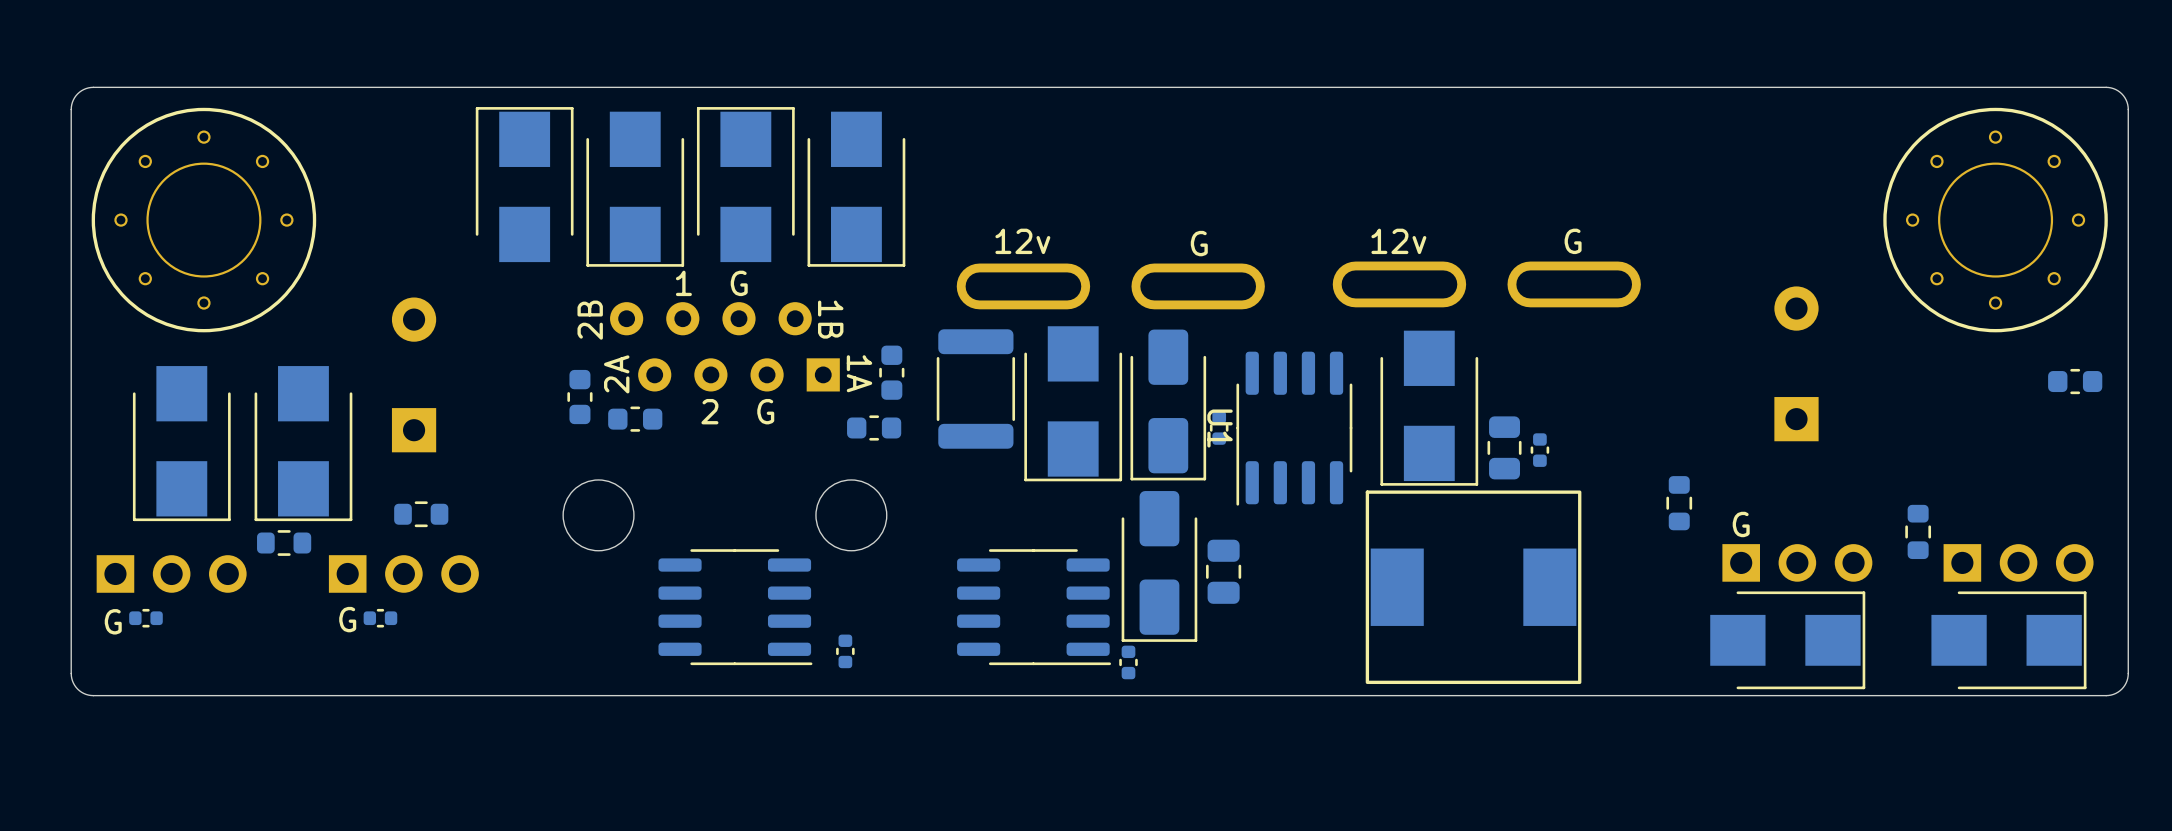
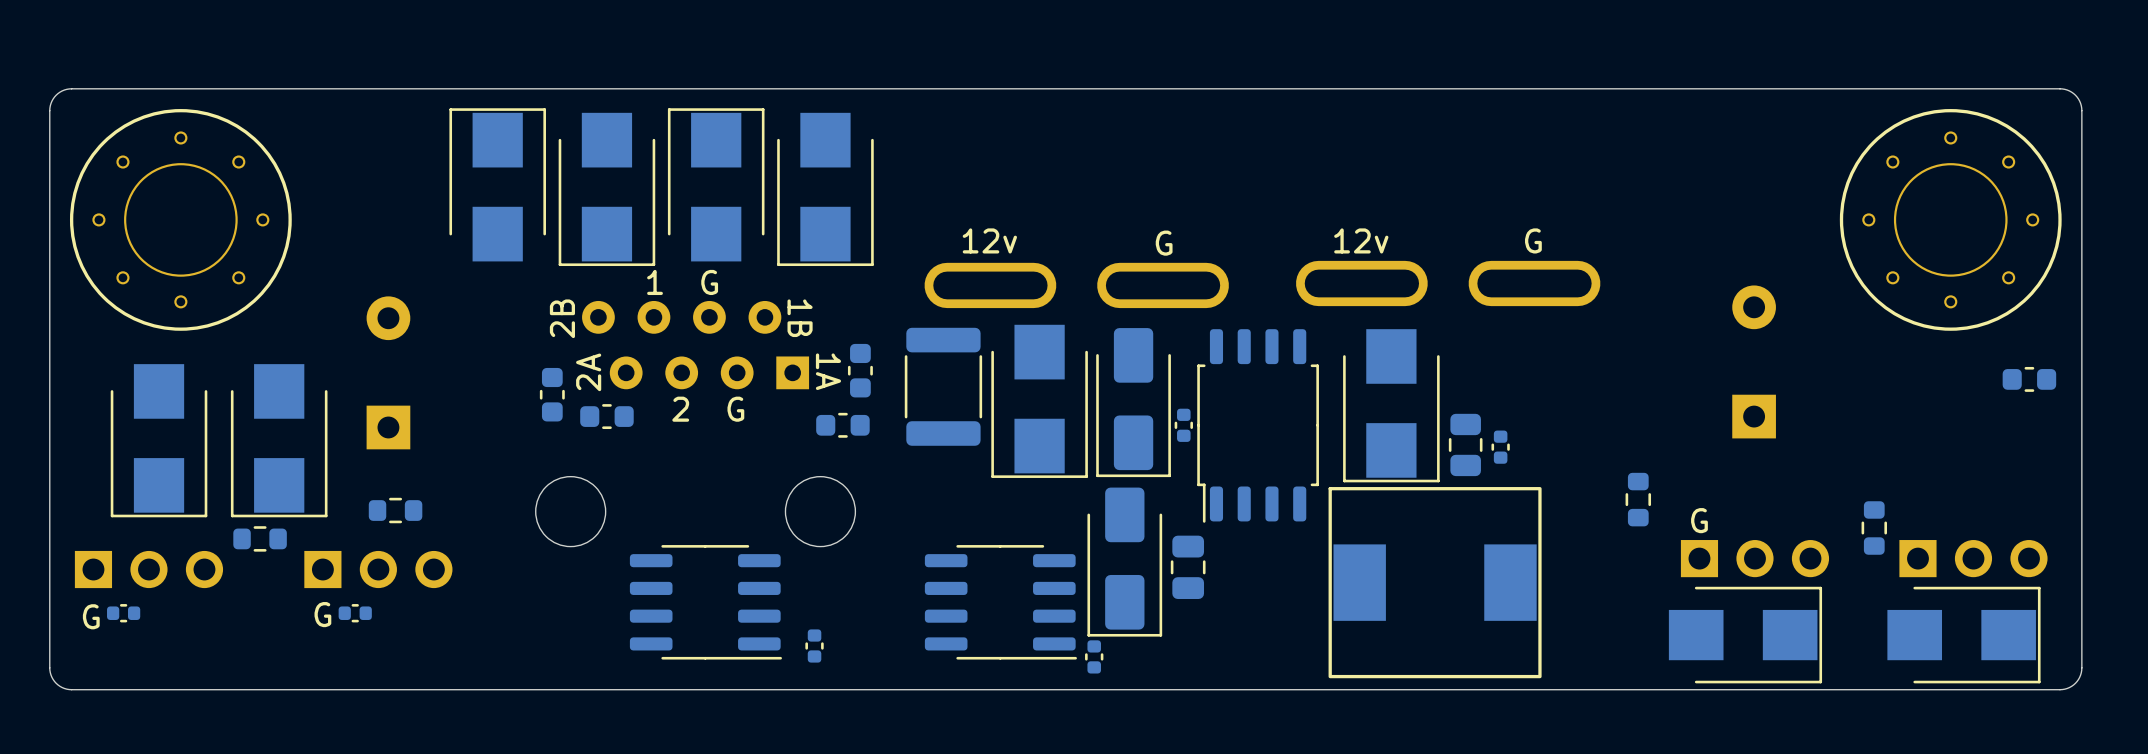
U1: (1294, 428) -> none
part: none -> (1258, 425)

